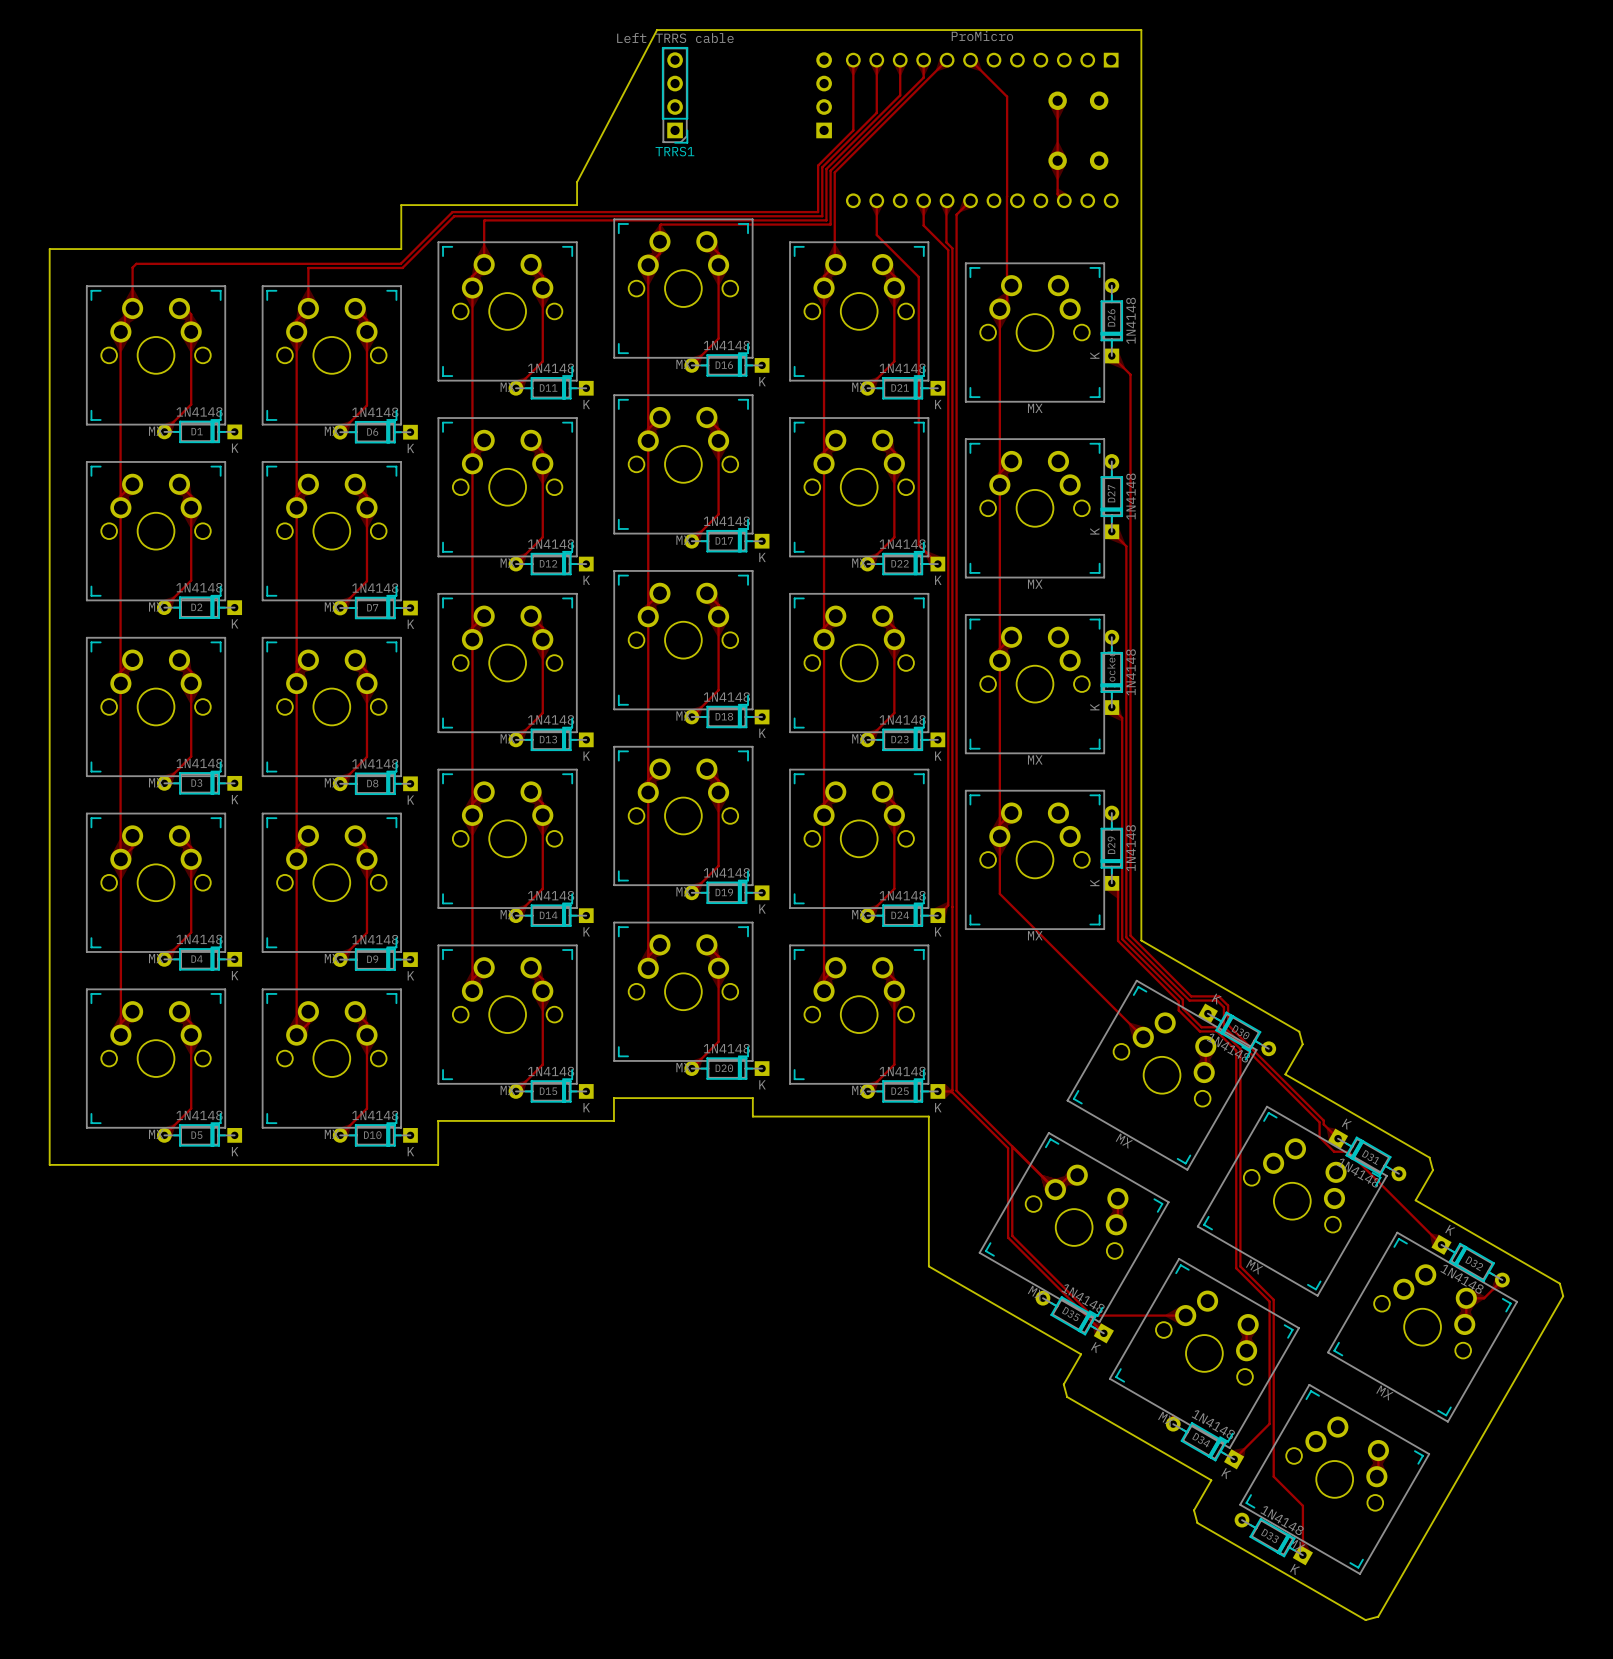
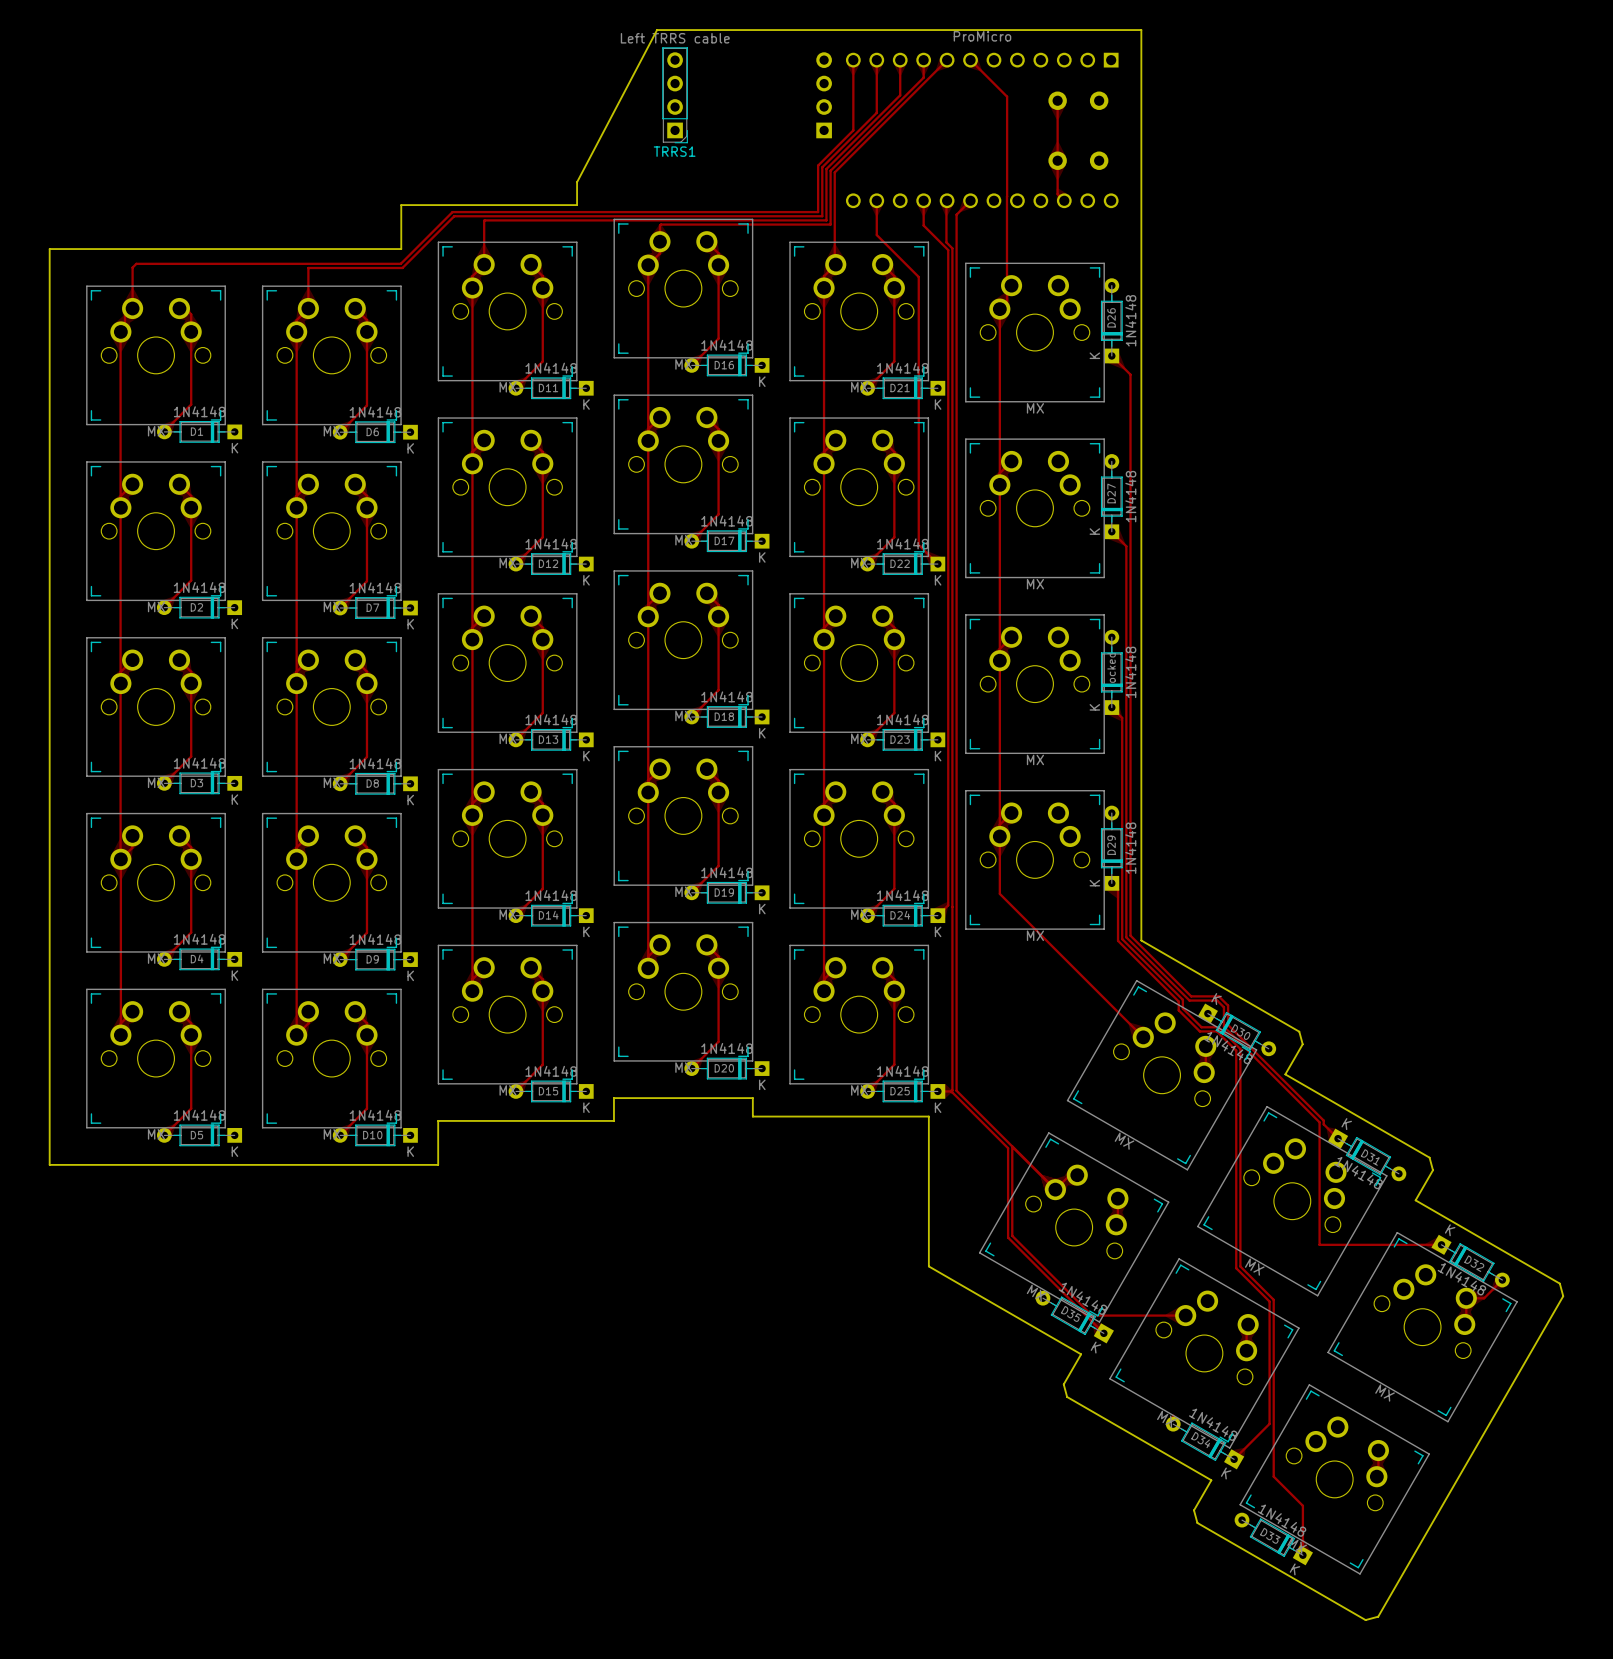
track: (1319, 1137) (1334, 1151) (1348, 1151) (1441, 1244) -> (1319, 1137) (1319, 1244) (1441, 1244)

